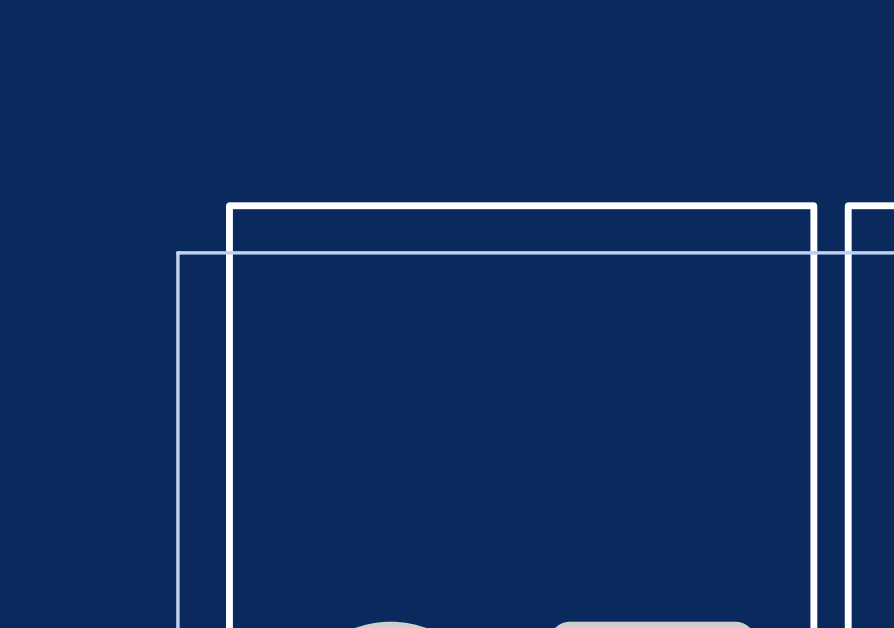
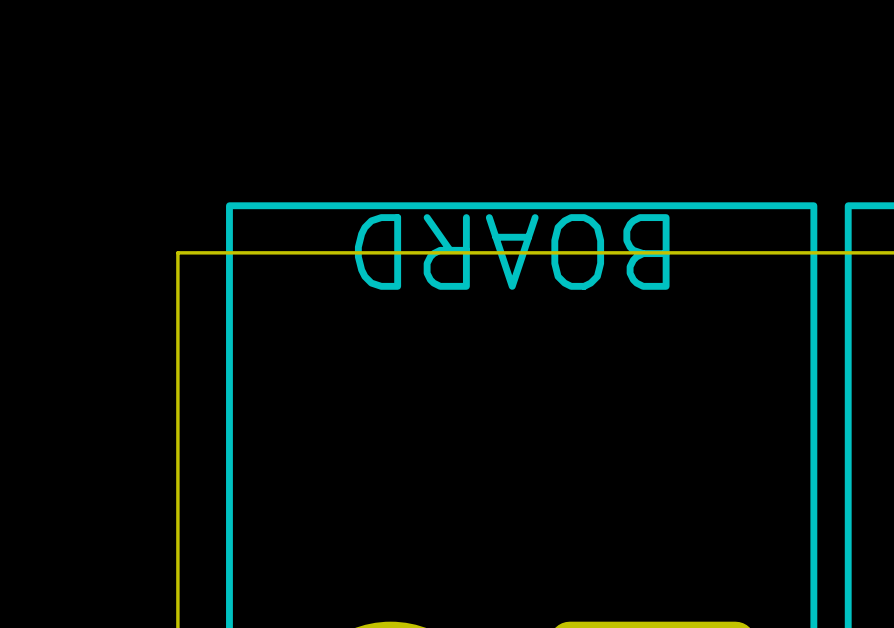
part text: none -> BOARD (512, 251)

